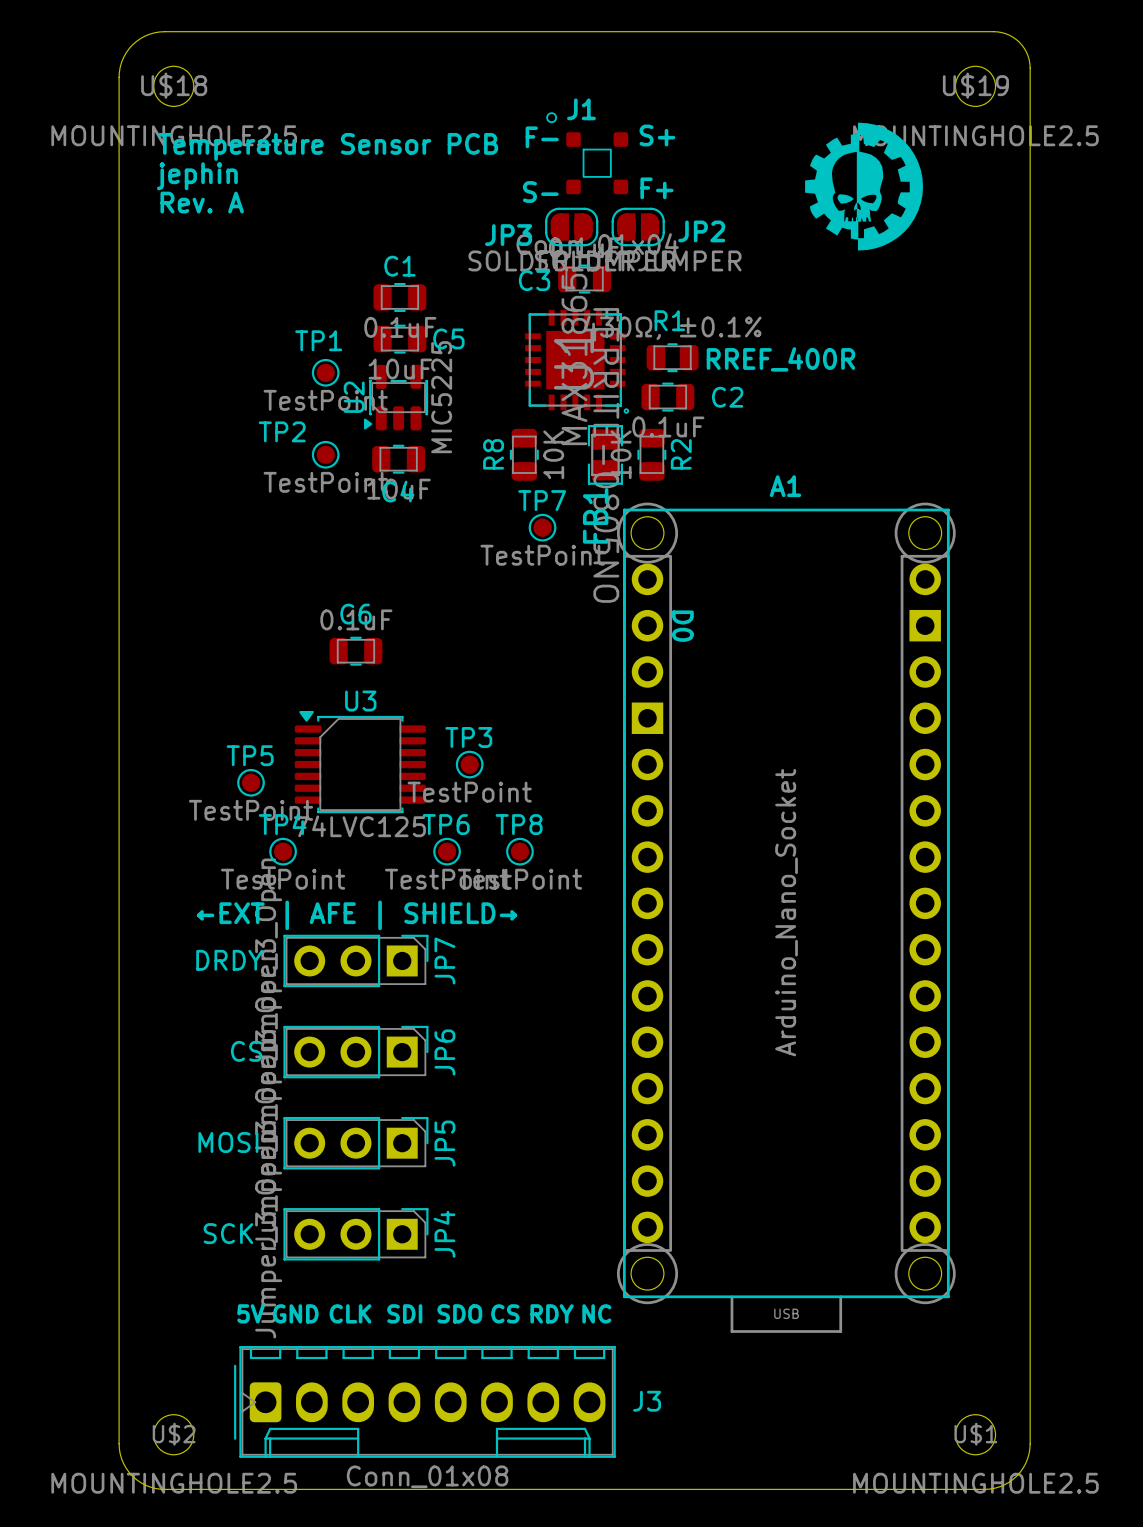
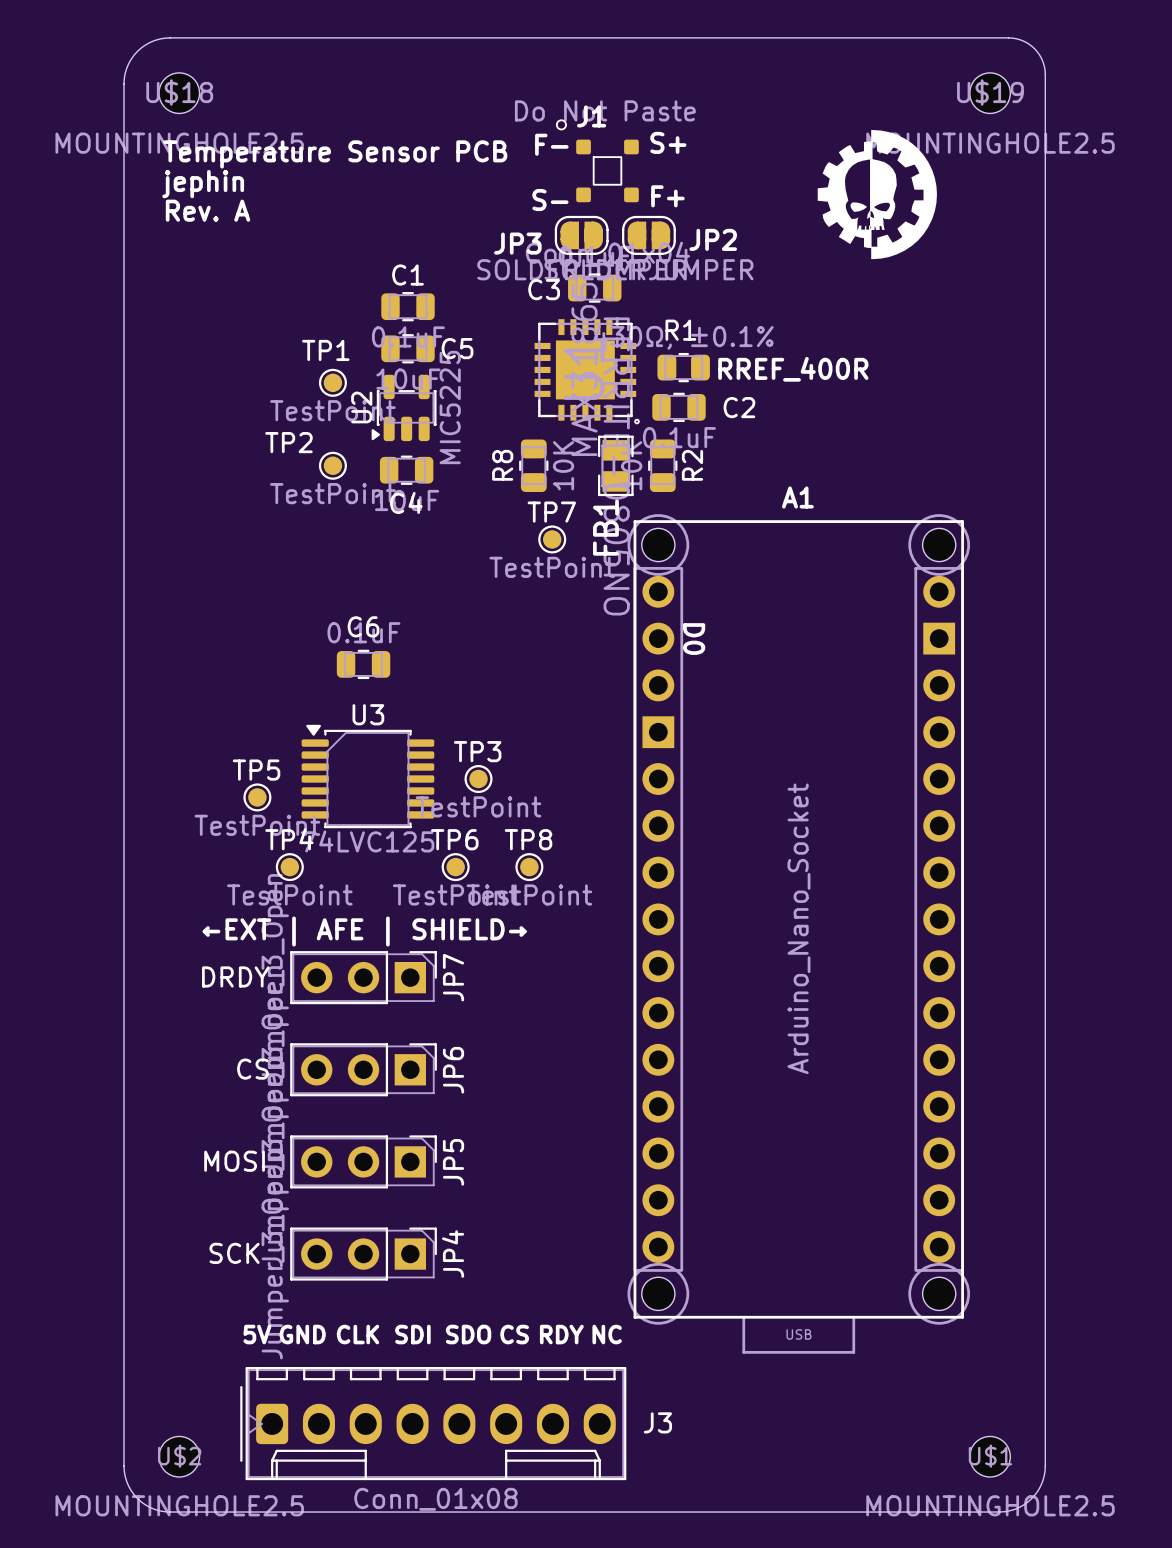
J1 text: none -> Do Not Paste (605, 110)

